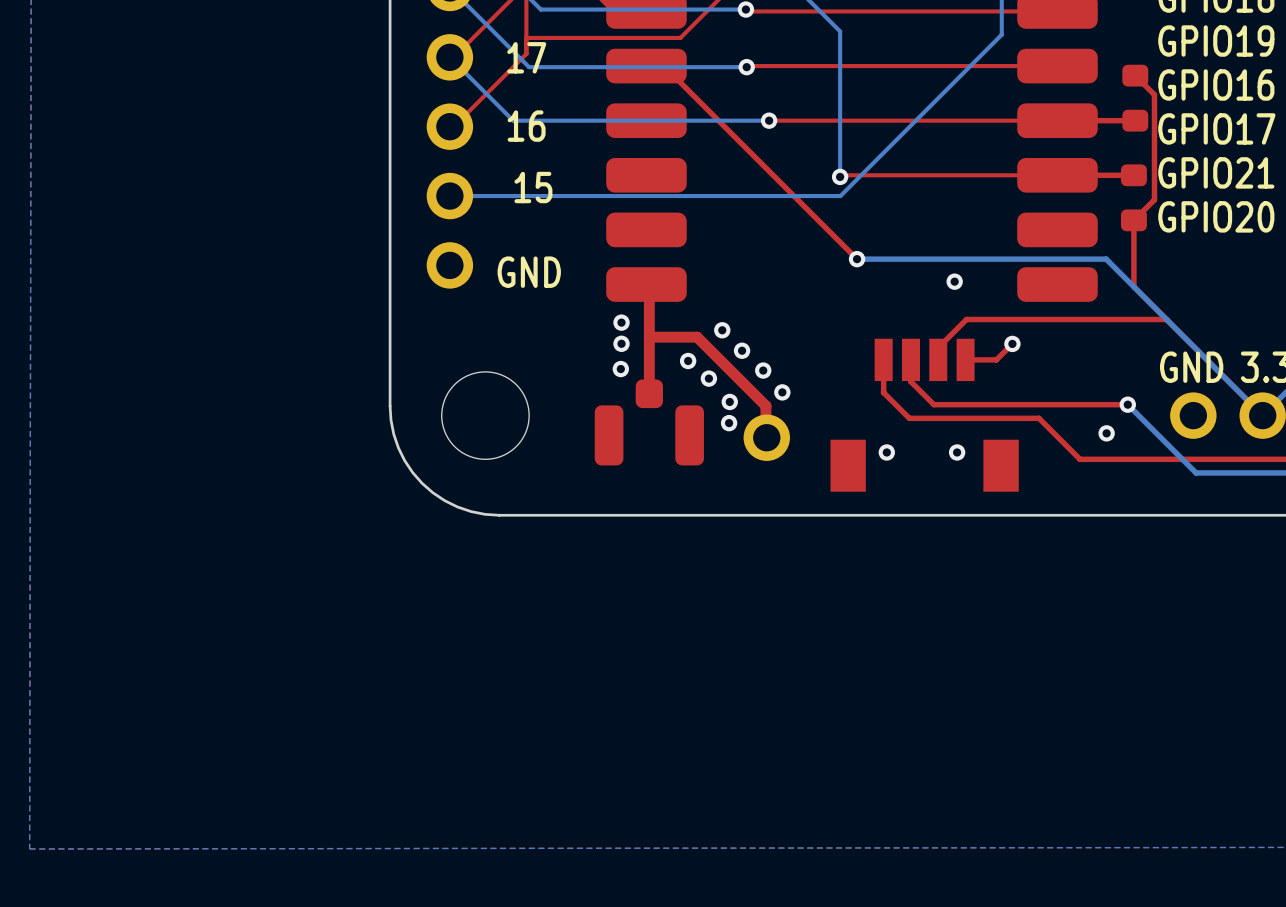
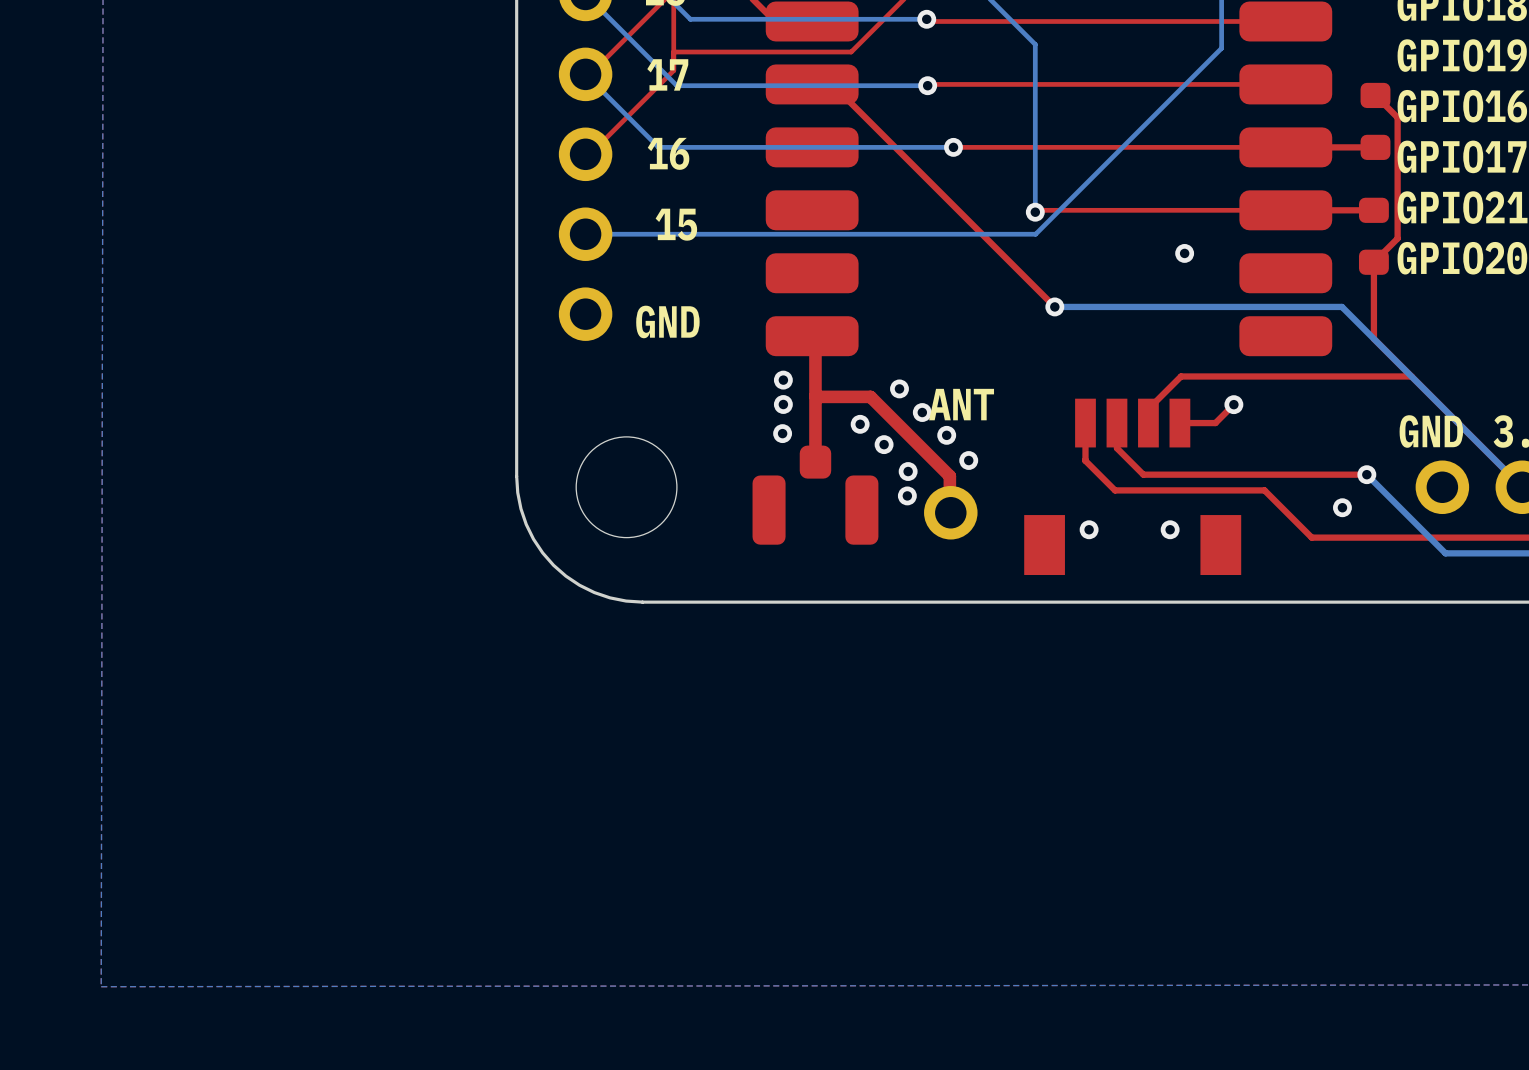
via position: (954, 281) -> (1184, 253)
text: none -> ANT (961, 404)

